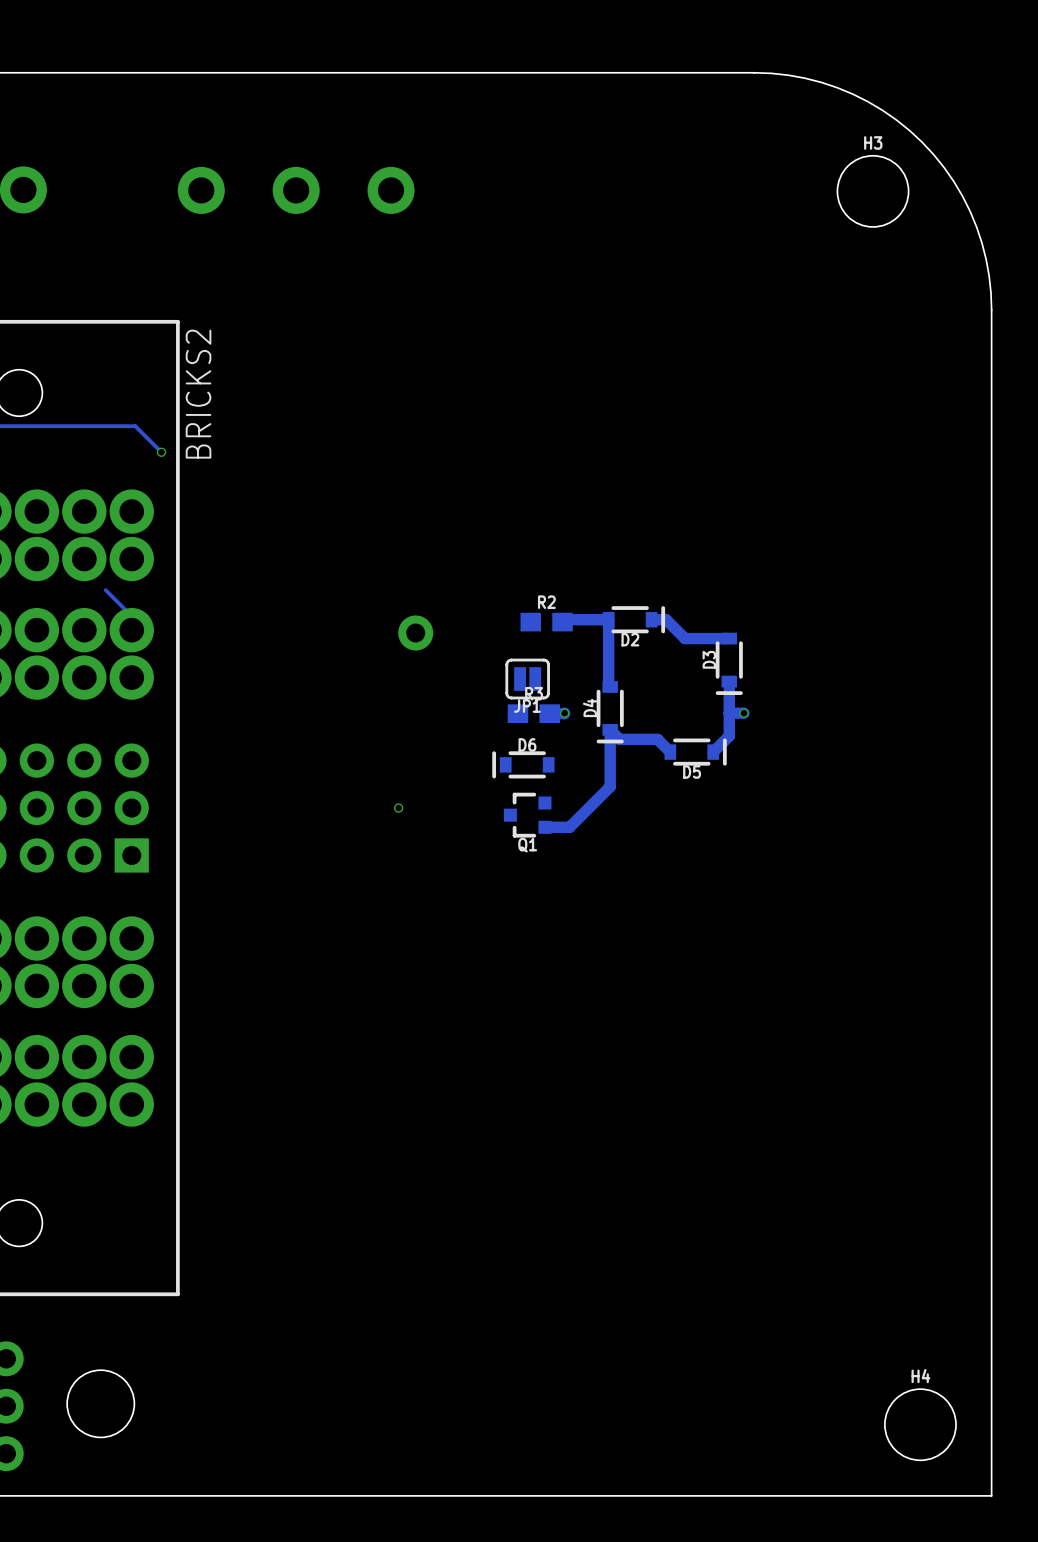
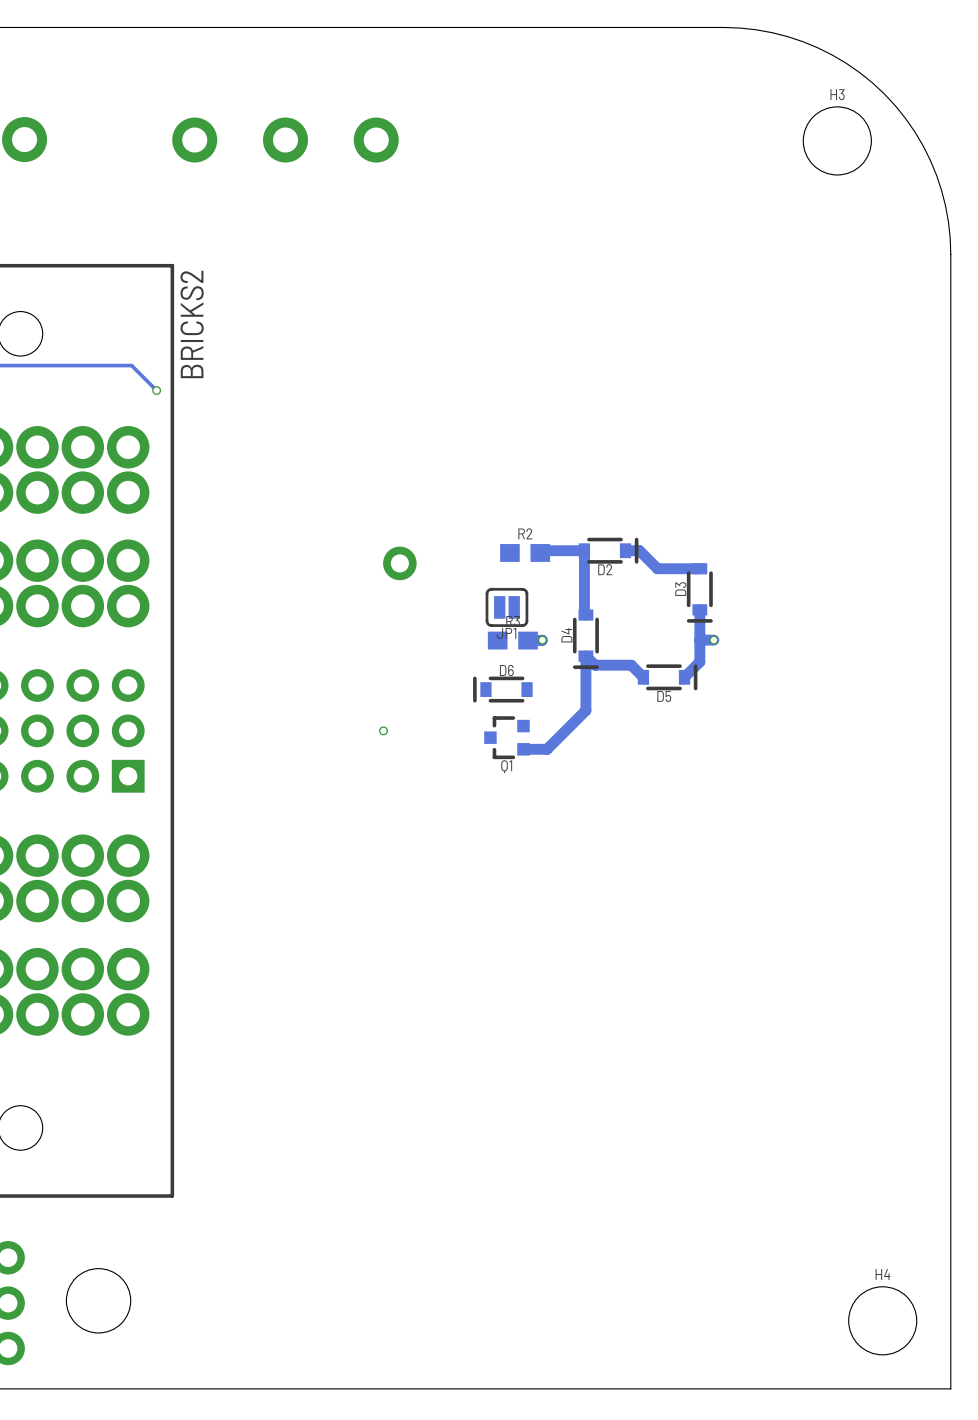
track: (105, 590) (129, 613) -> none

